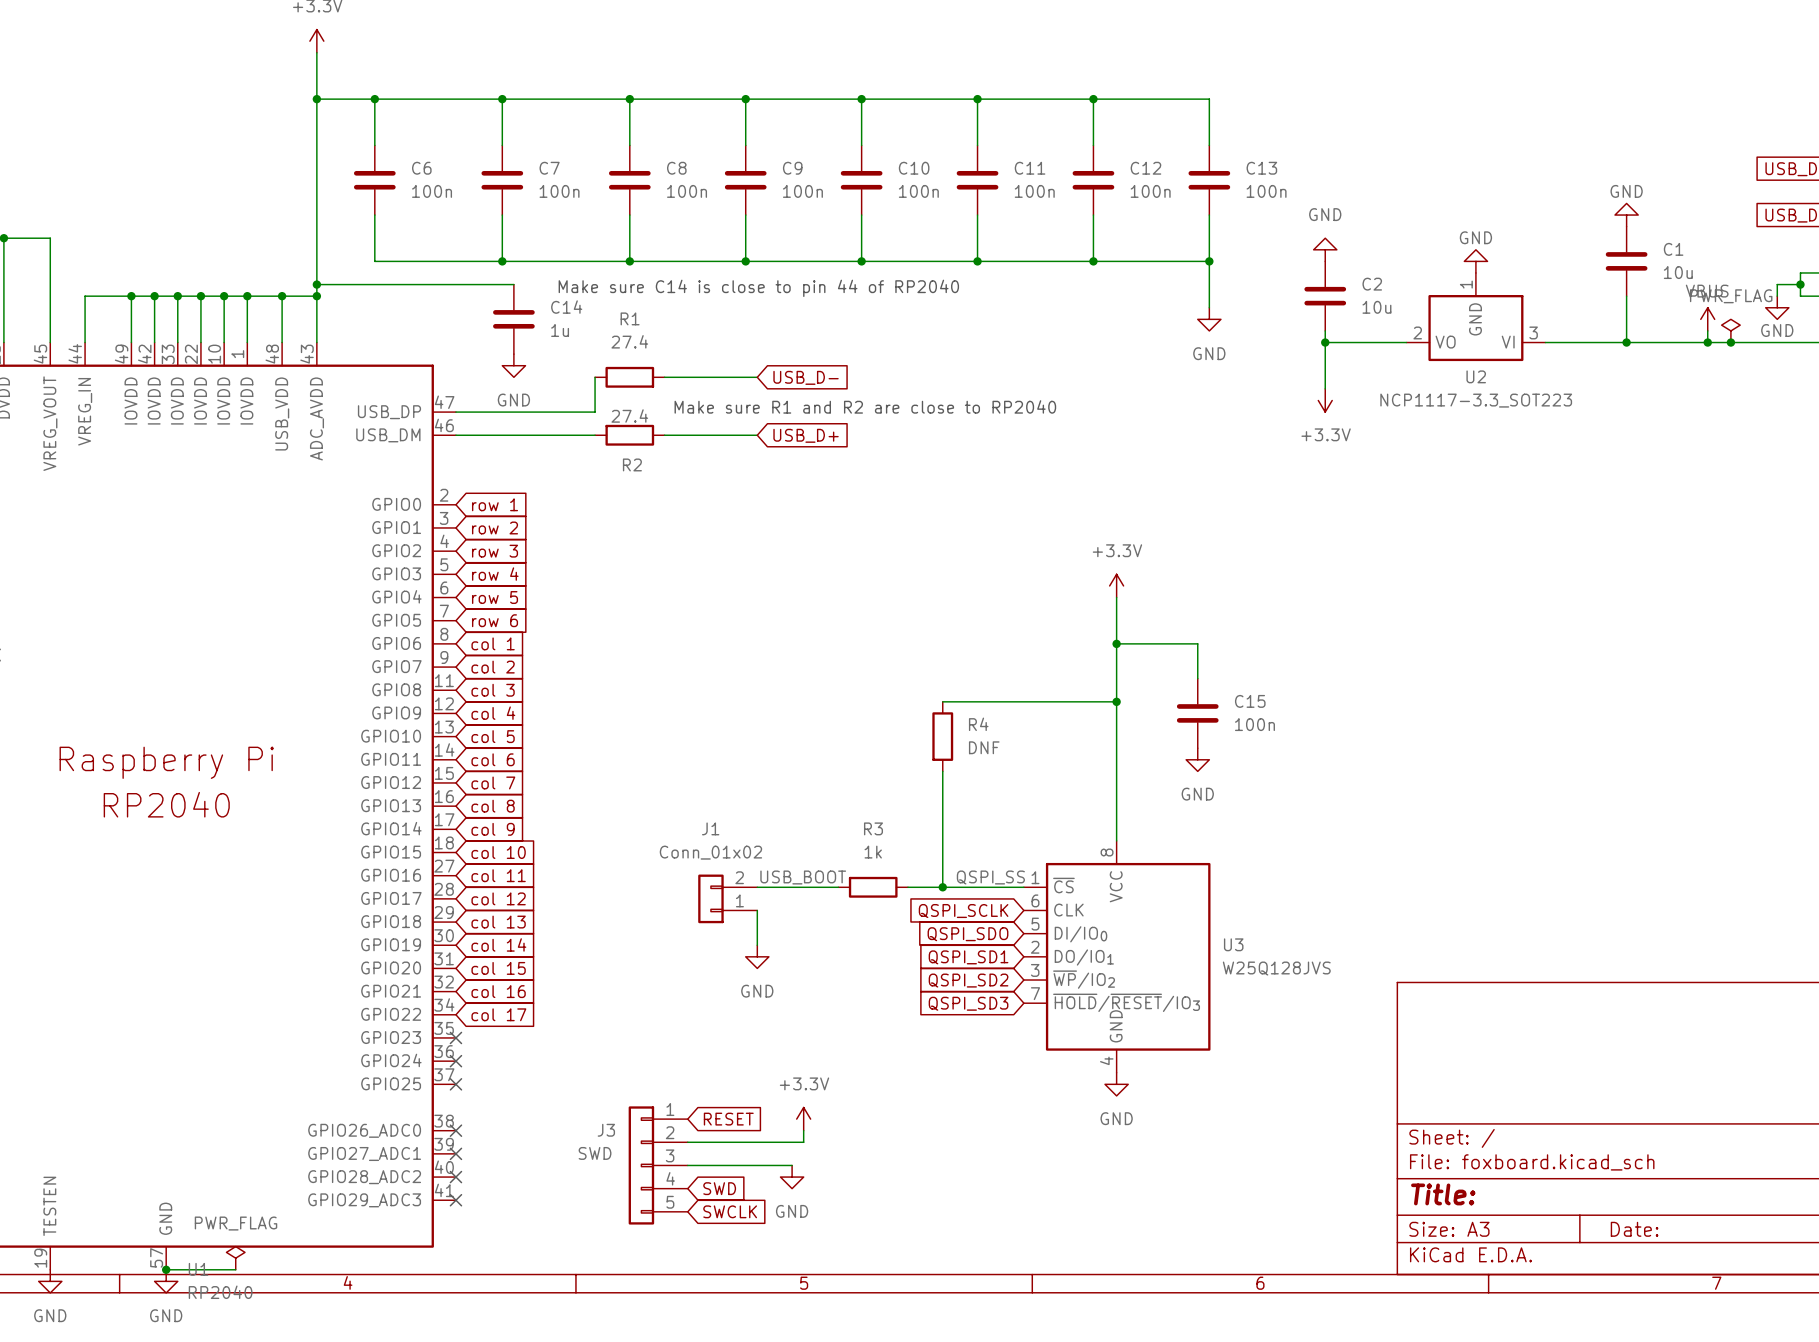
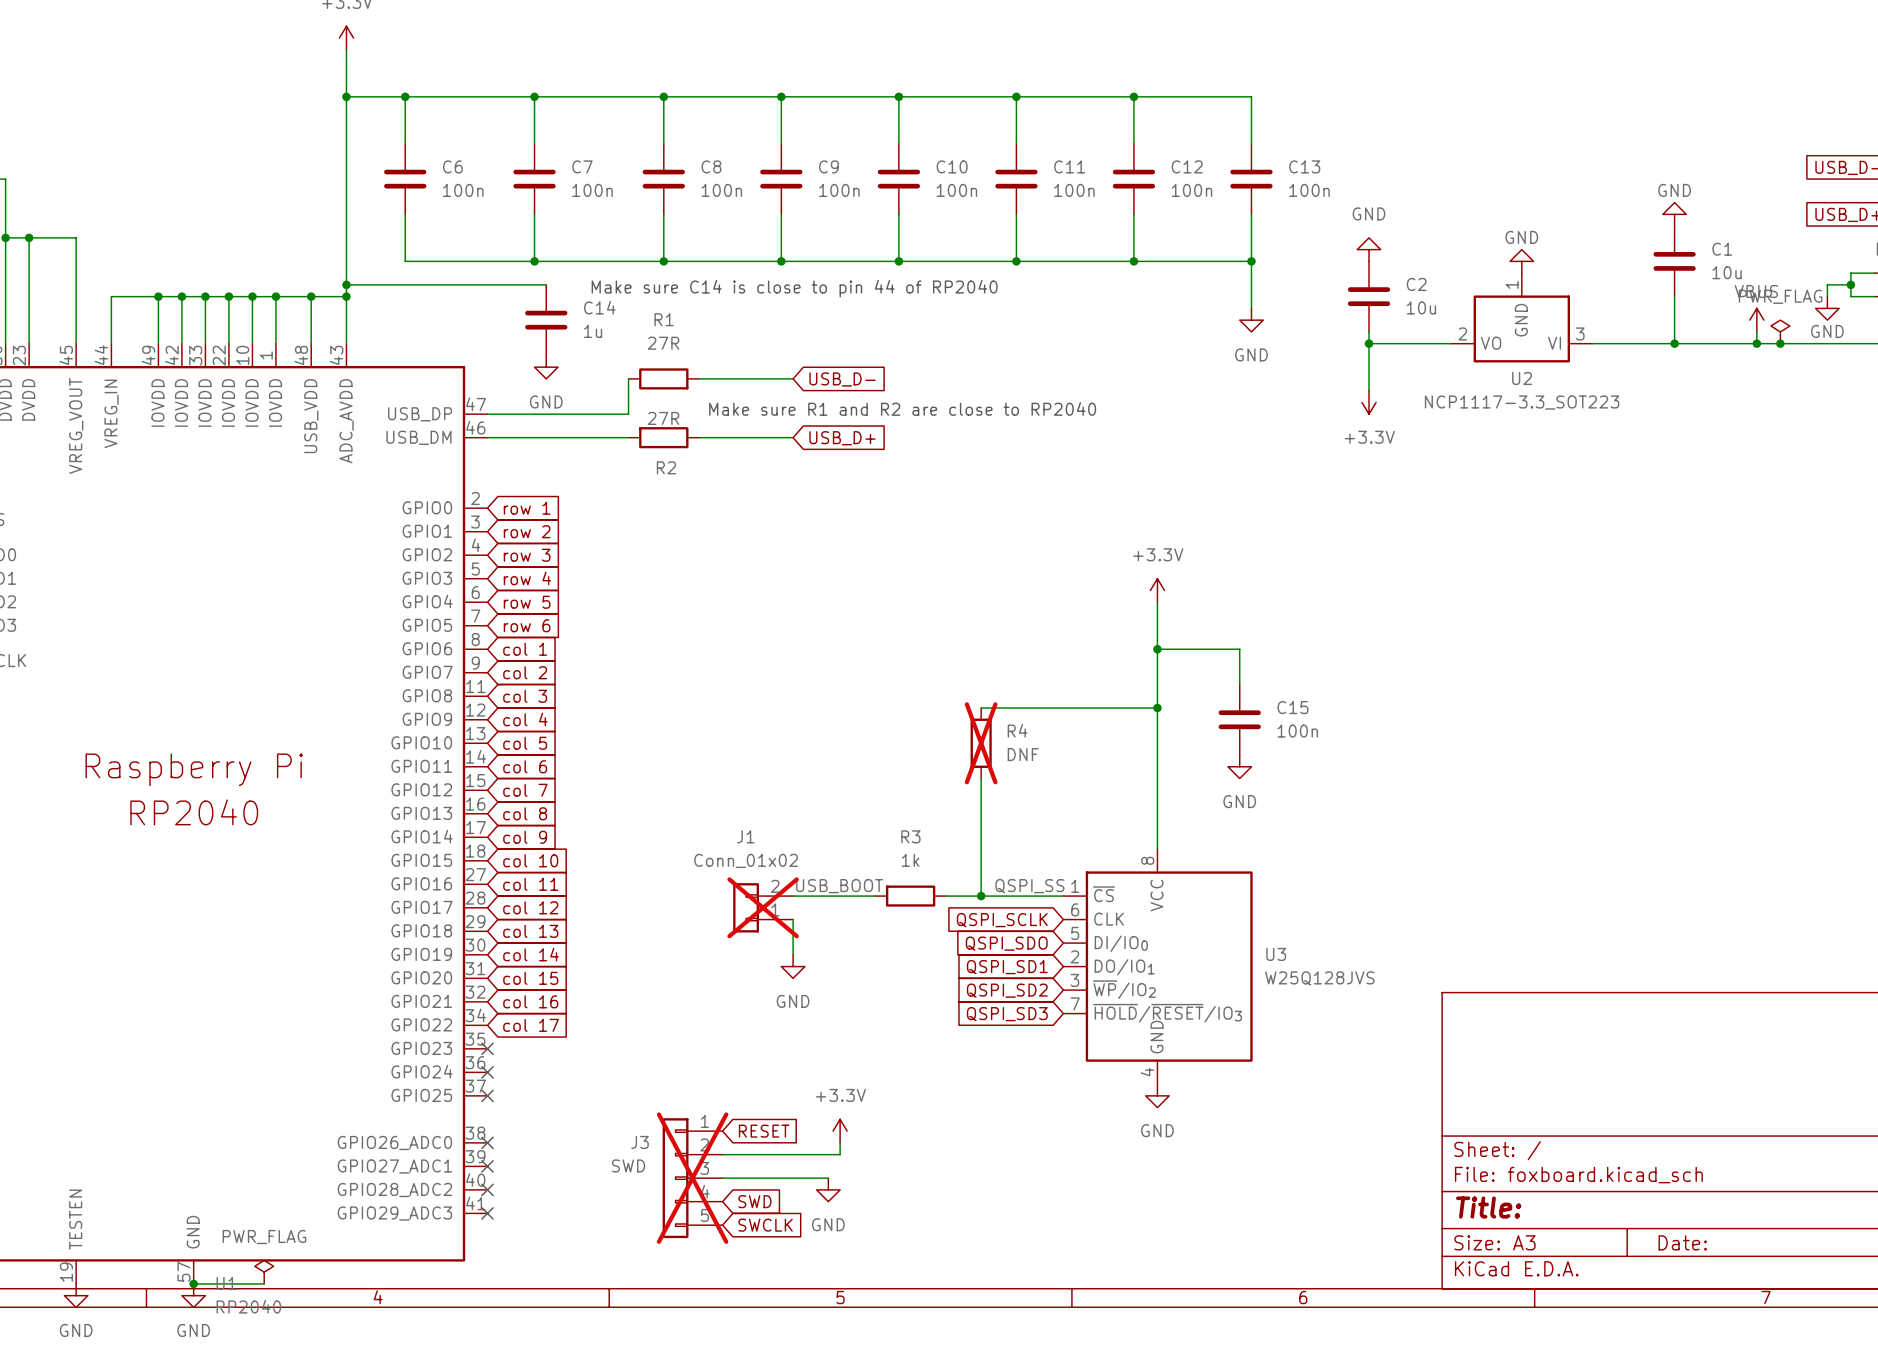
R1 value: 27.4 (629, 341) -> 27R (663, 343)
R2 value: 27.4 (629, 416) -> 27R (663, 418)
R4 do-not-place cross: none -> (981, 743)
J1 do-not-place cross: none -> (763, 907)
J3 do-not-place cross: none -> (692, 1178)

